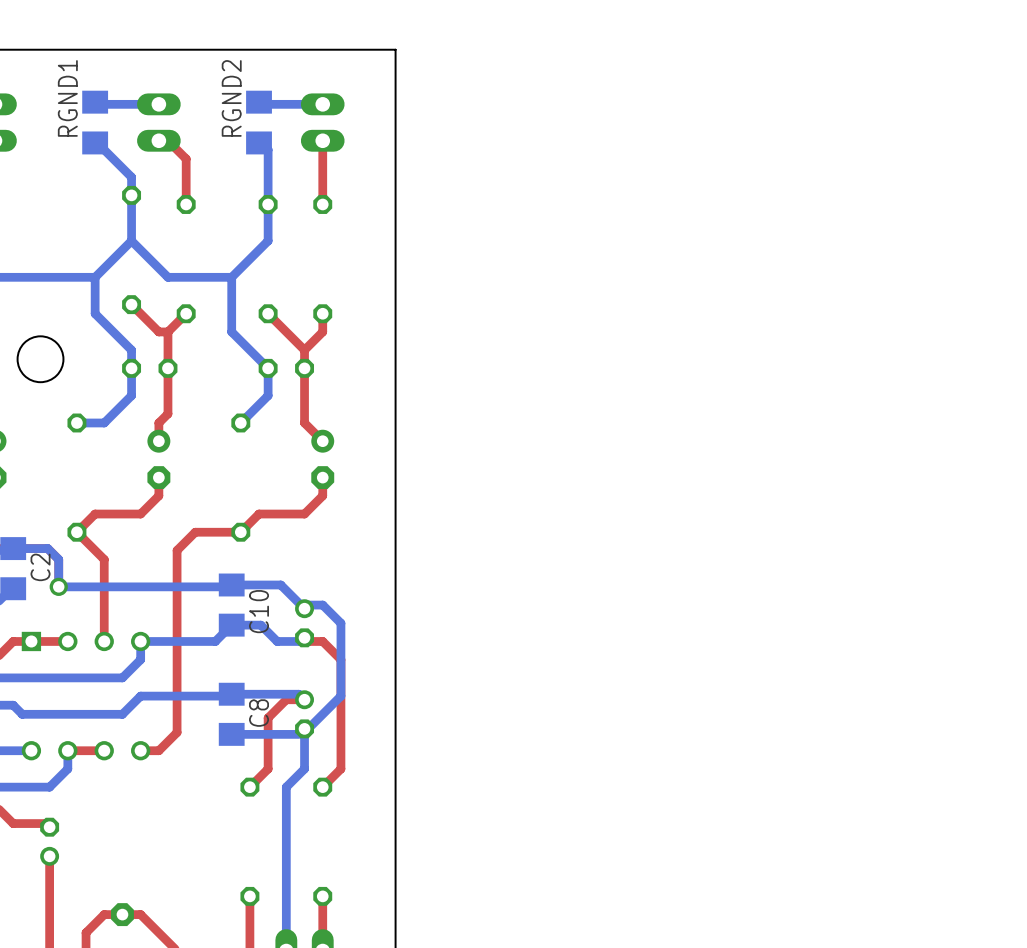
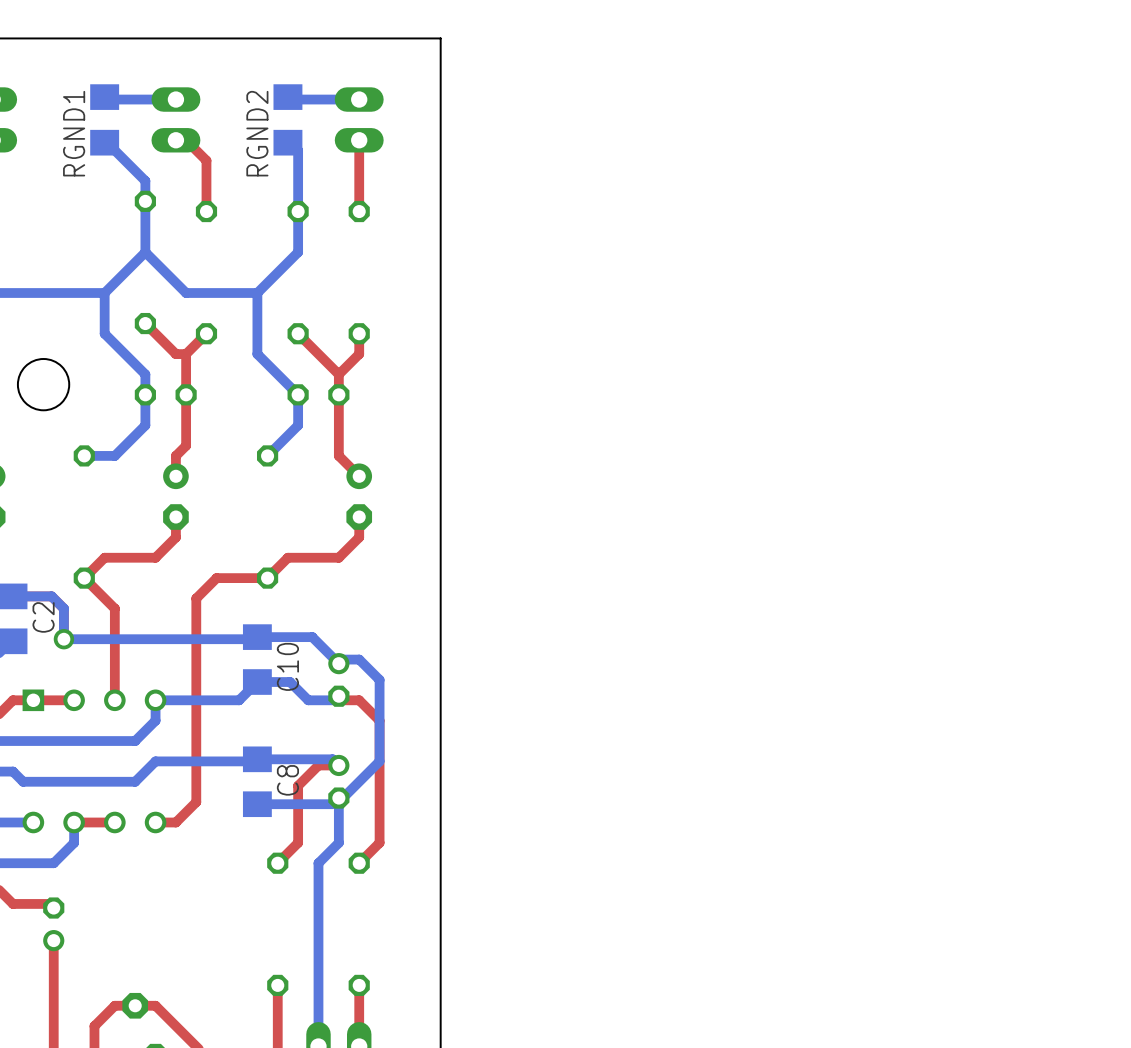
RGND1 name position: RGND1 (67, 98) -> RGND1 (74, 133)
RGND2 name position: RGND2 (231, 98) -> RGND2 (257, 133)

